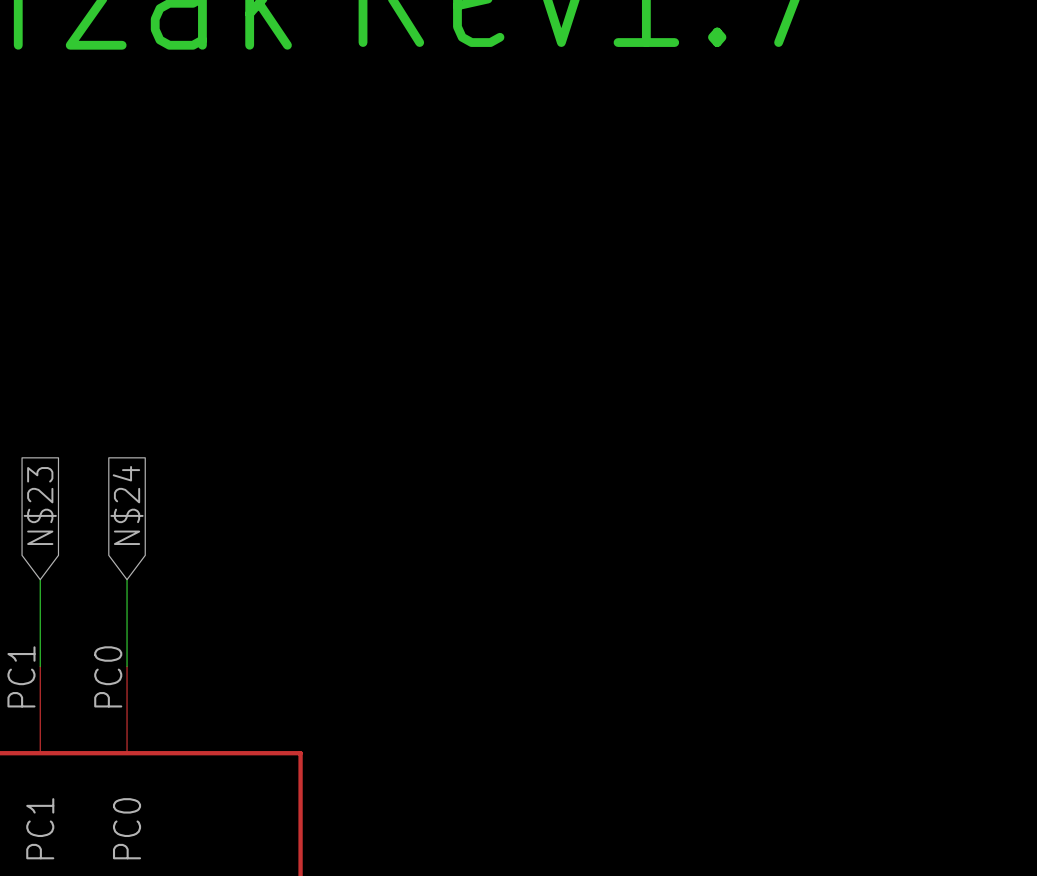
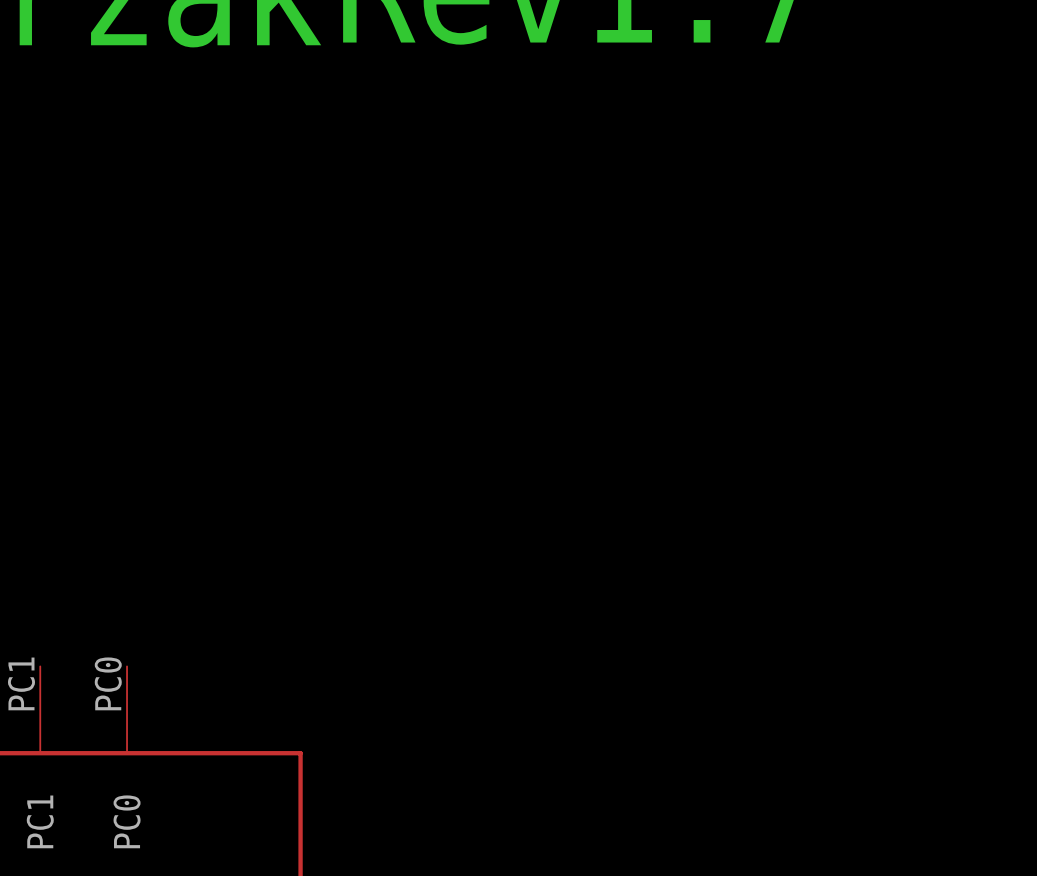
global label: N$24 (127, 505) -> none
global label: N$23 (40, 506) -> none
wire: (40, 579) (40, 666) -> none
wire: (127, 579) (127, 666) -> none

